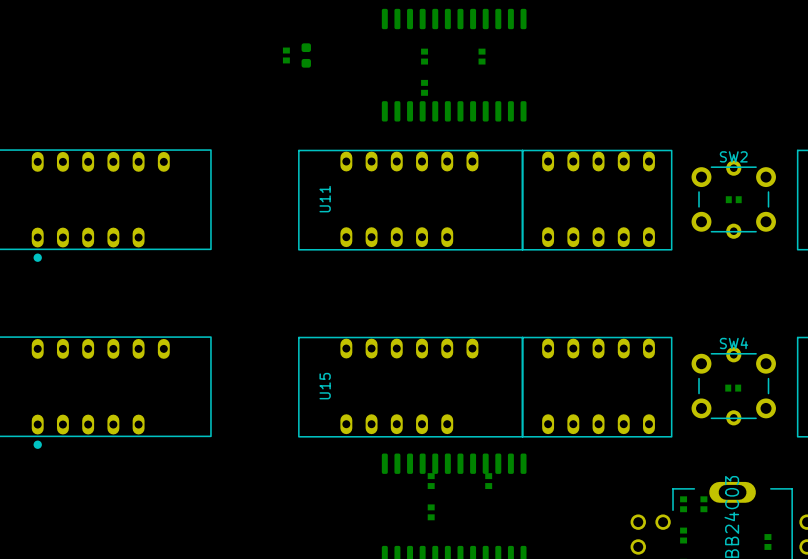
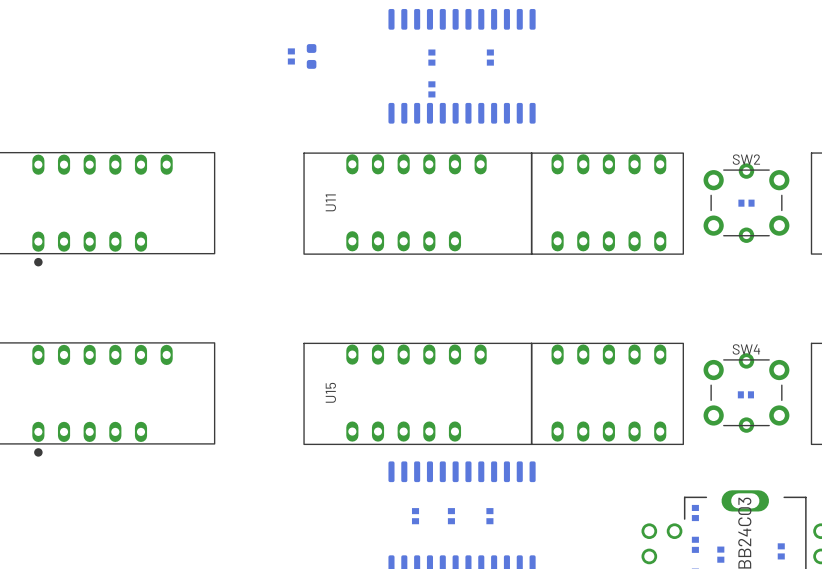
part: (431, 481) -> none
part: (488, 481) -> none
part position: (703, 504) -> (720, 554)
part: none -> (415, 516)
part: none -> (451, 516)
part: none -> (489, 516)
part: (431, 512) -> none

